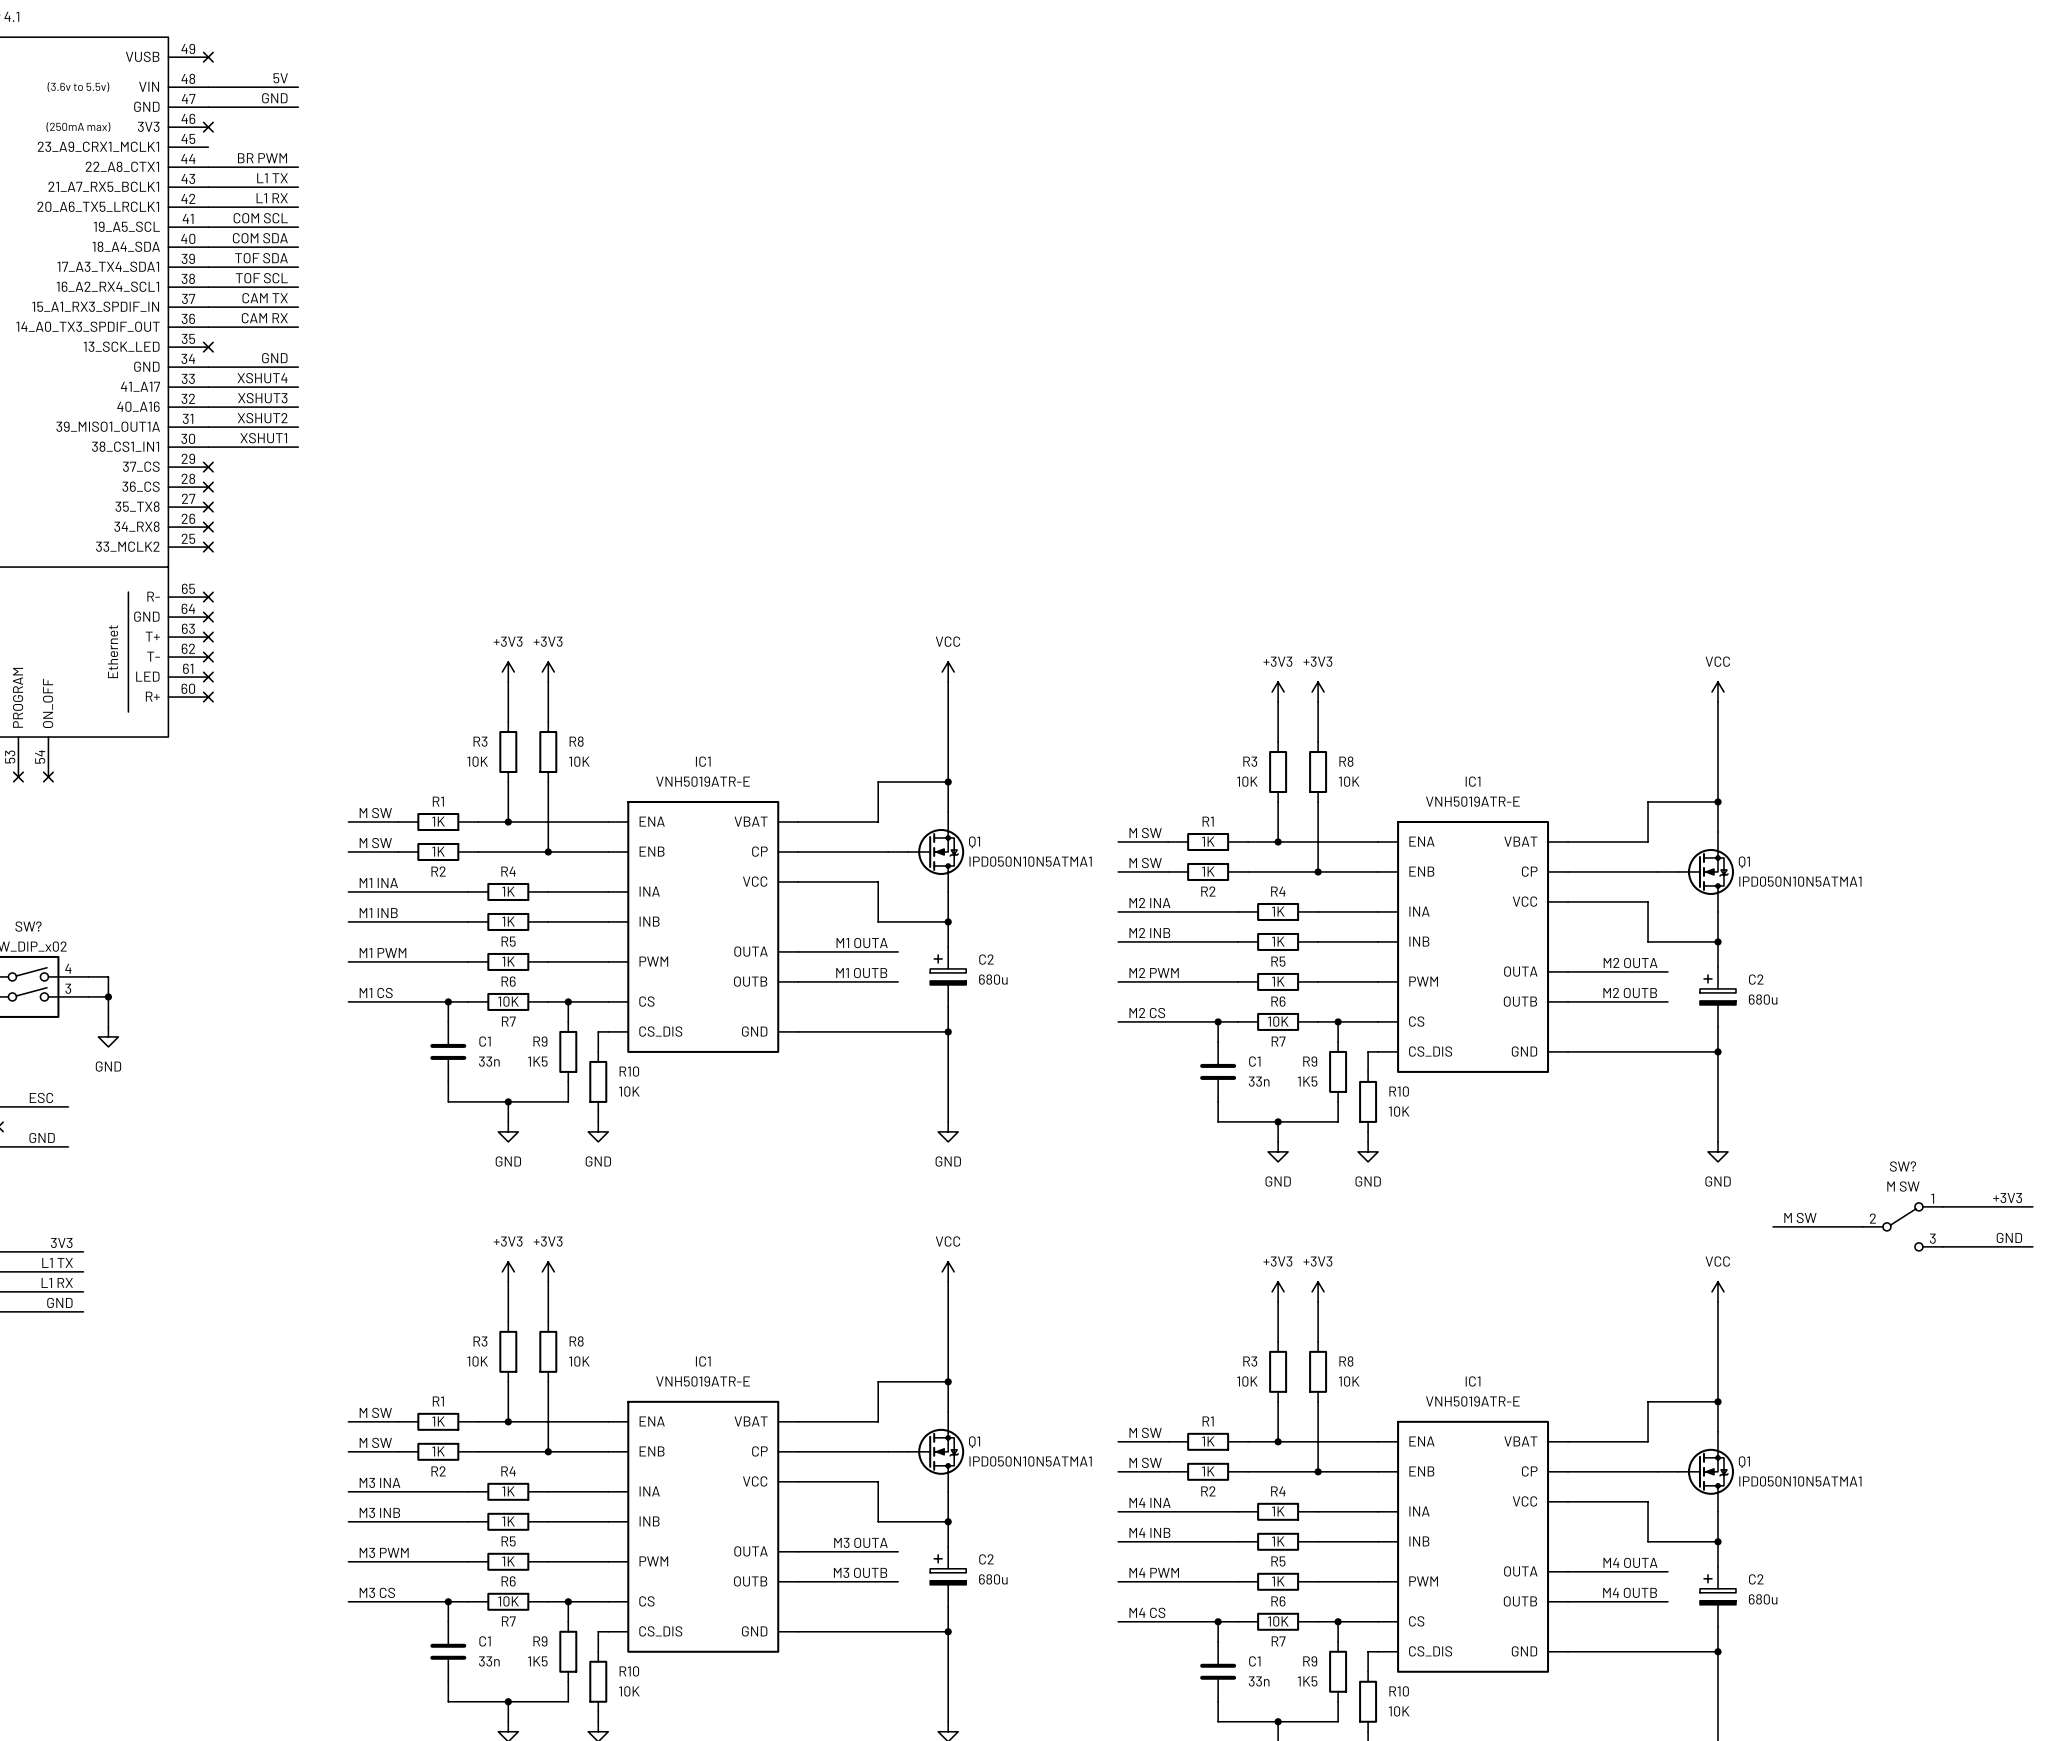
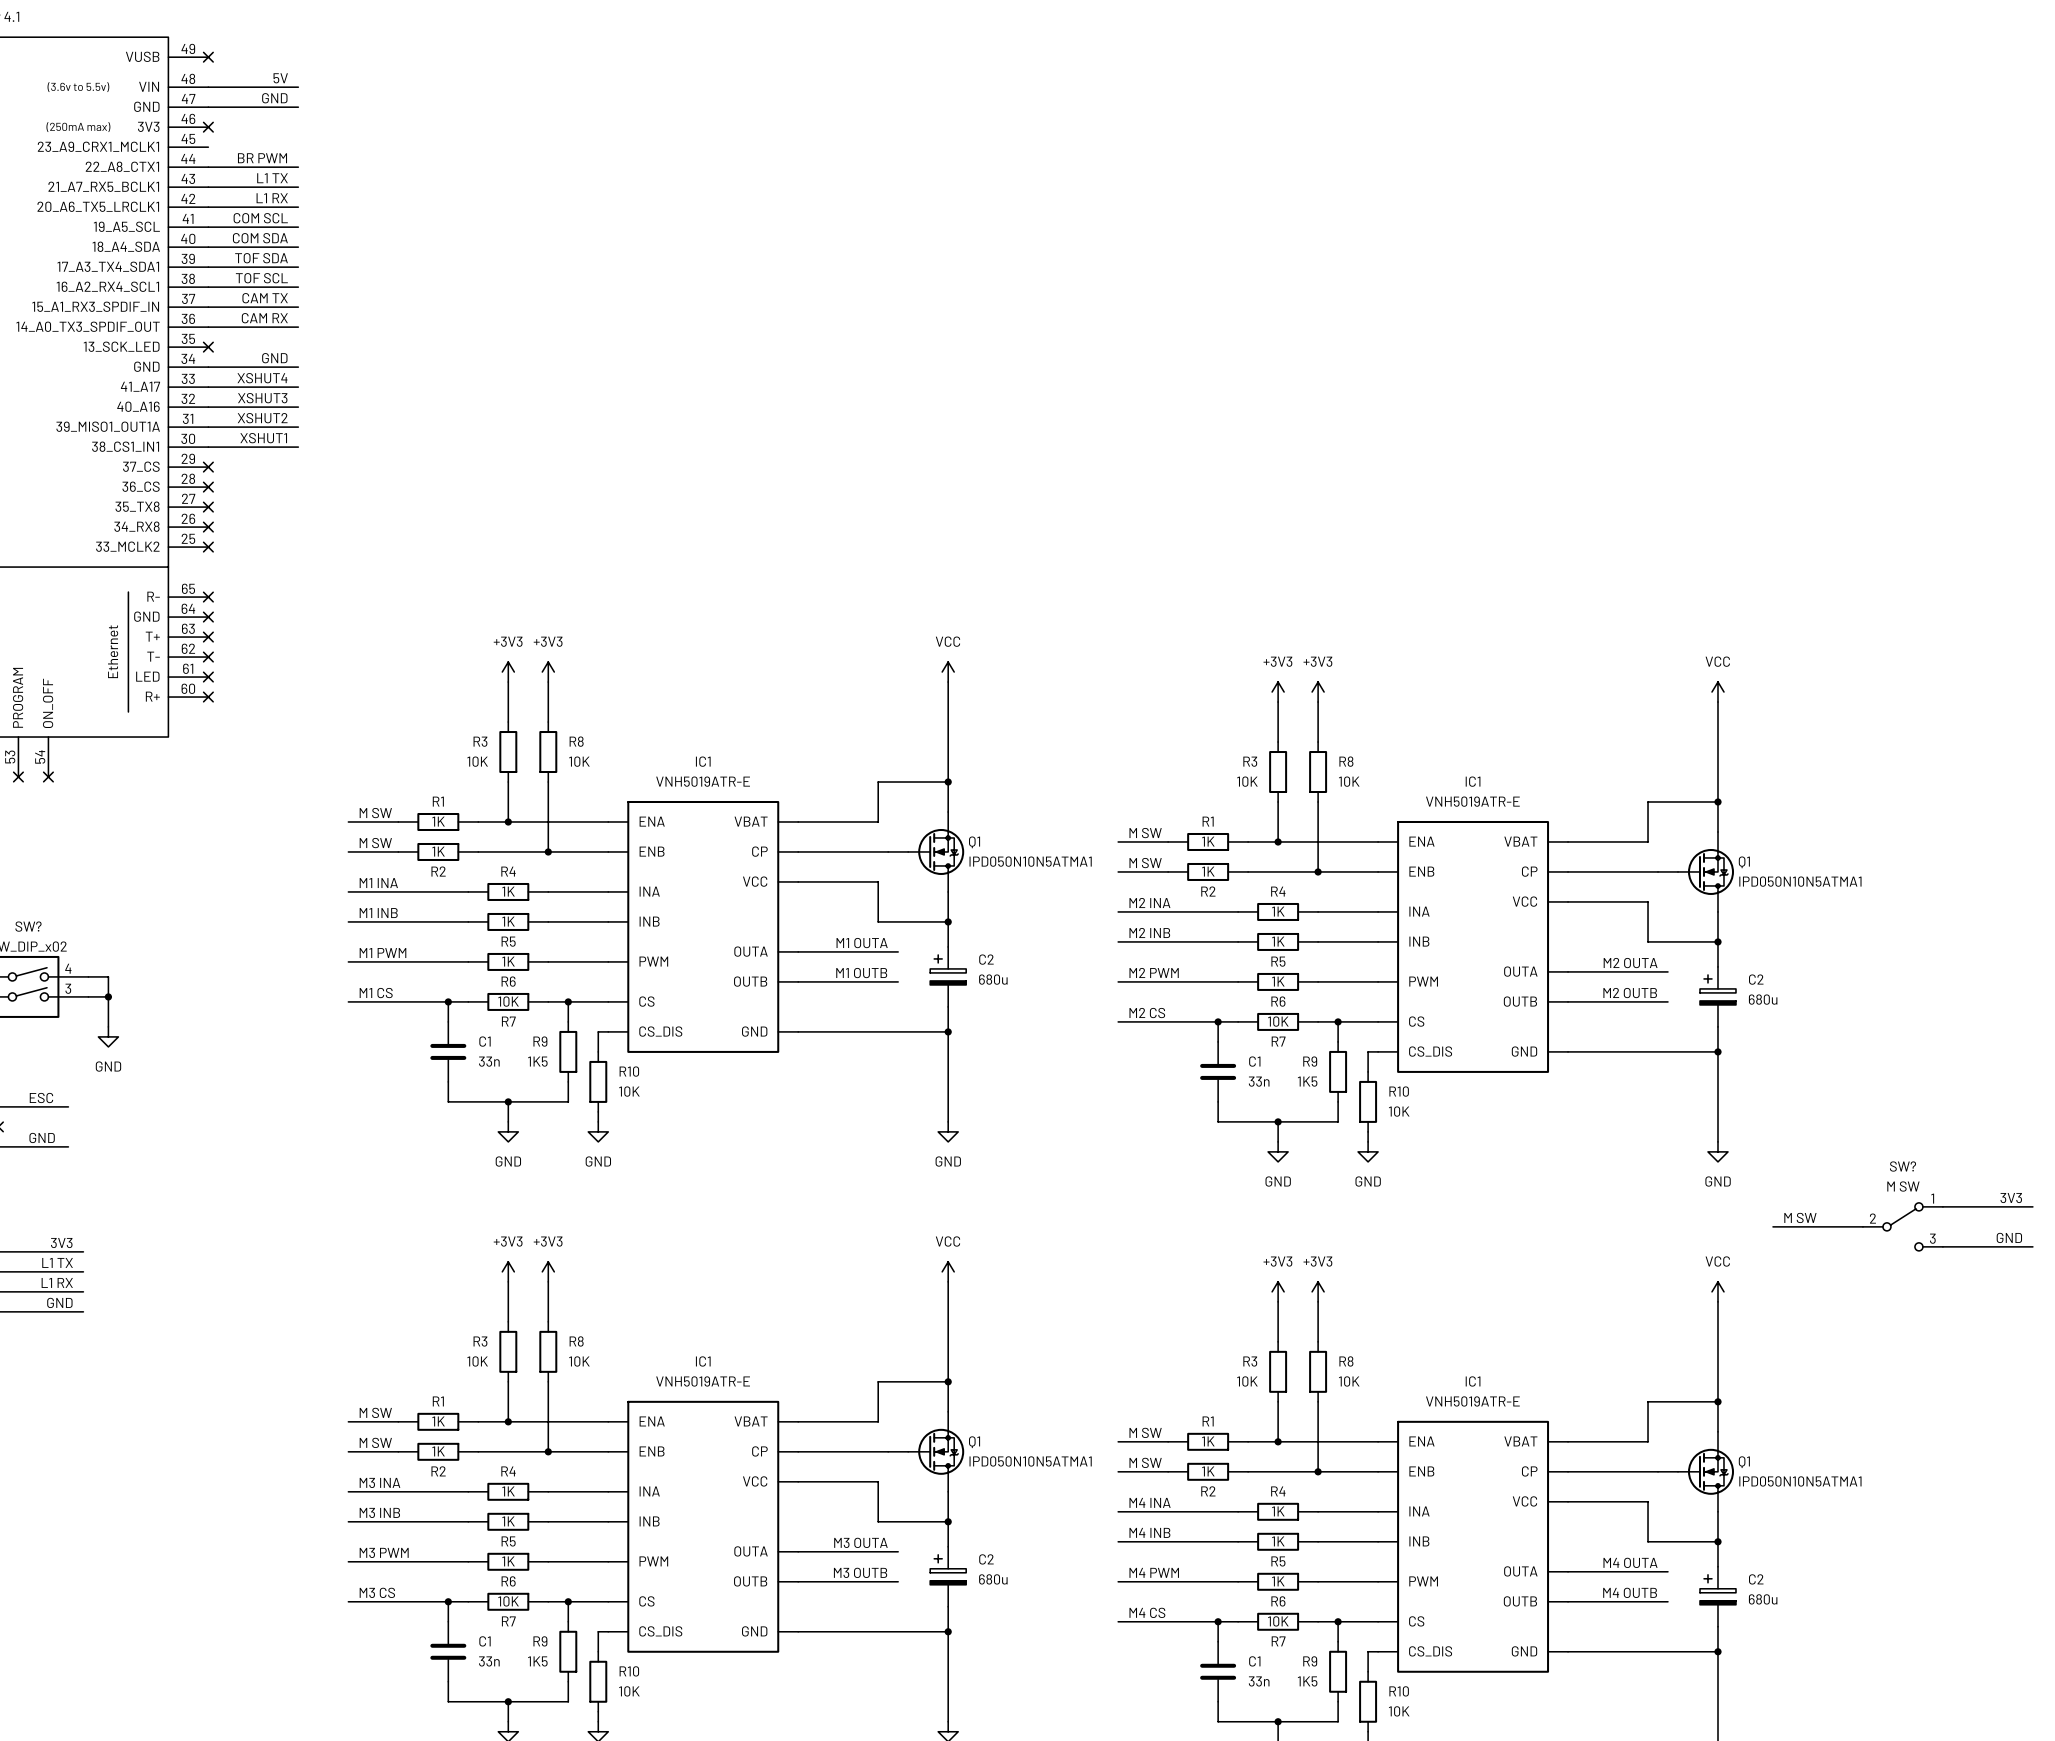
label: +3V3 (2007, 1198) -> 3V3 (2011, 1198)

